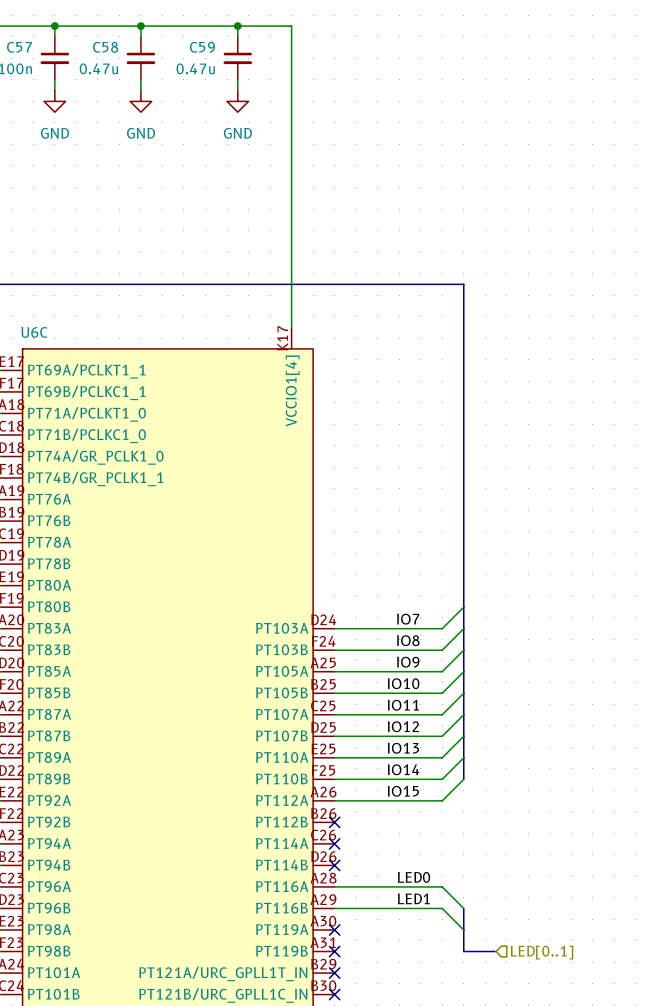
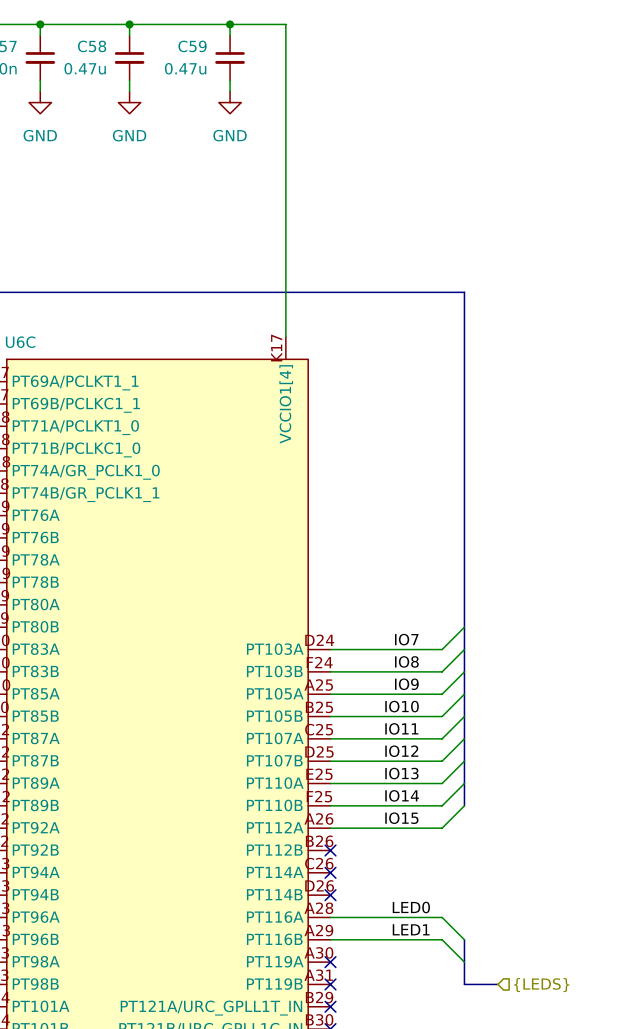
hierarchical label: LED[0..1] (542, 952) -> {LEDS} (541, 985)

